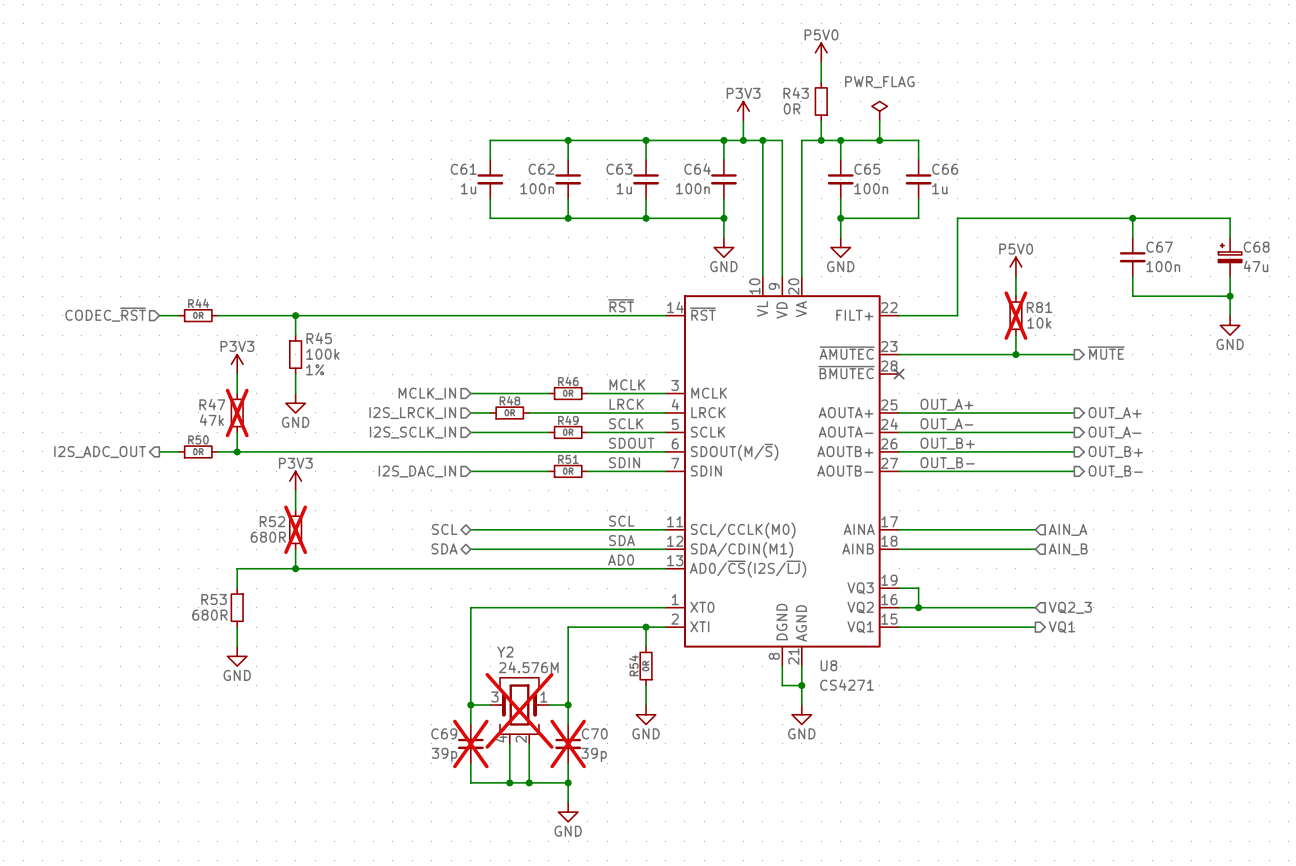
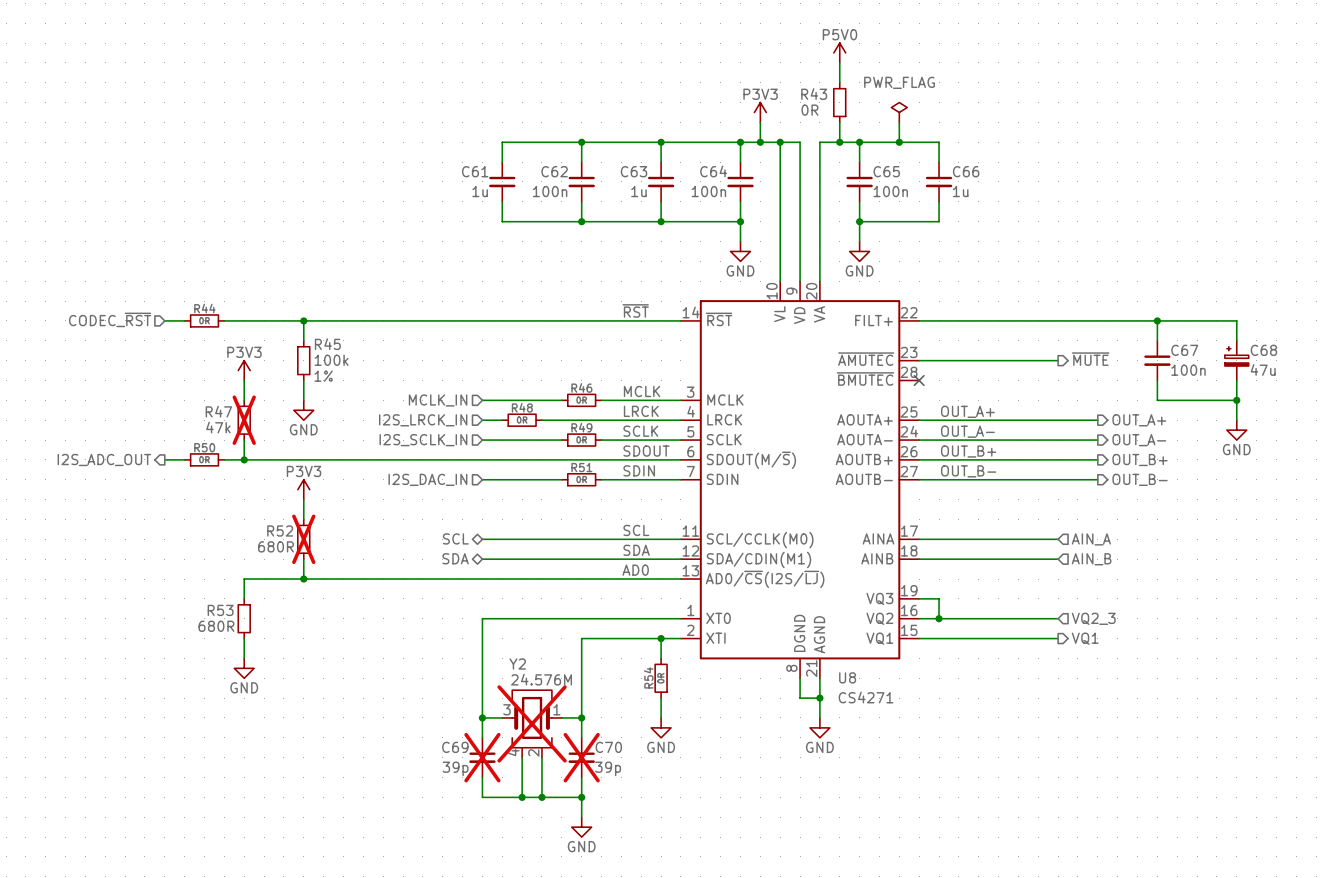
wire: (1132, 218) (1132, 237) -> (1157, 320) (1157, 340)
junction: (1132, 218) -> none
wire: (1230, 237) (1230, 218) (957, 218) (957, 315) -> (1236, 340) (1236, 320) (978, 320)
C67 position: (1132, 257) -> (1157, 360)
C68 position: (1230, 257) -> (1236, 360)
power symbol: P5V0 (1015, 266) -> none
wire: (1015, 276) (1015, 296) -> none
wire: (1132, 276) (1132, 296) (1230, 296) -> none
wire: (1230, 276) (1230, 315) -> (1236, 380) (1236, 420)
junction: (1230, 296) -> none
R81: 10k (1015, 315) -> none
junction: none -> (1157, 320)
power symbol position: GND (1230, 325) -> GND (1236, 430)
wire: (1015, 335) (1015, 354) -> none
hierarchical label position: ~{MUTE} (1106, 353) -> ~{MUTE} (1090, 359)
junction: (1015, 354) -> none
wire: (1035, 354) (1074, 354) -> none
wire: none -> (1157, 380) (1157, 400) (1236, 400)
junction: none -> (1236, 400)

